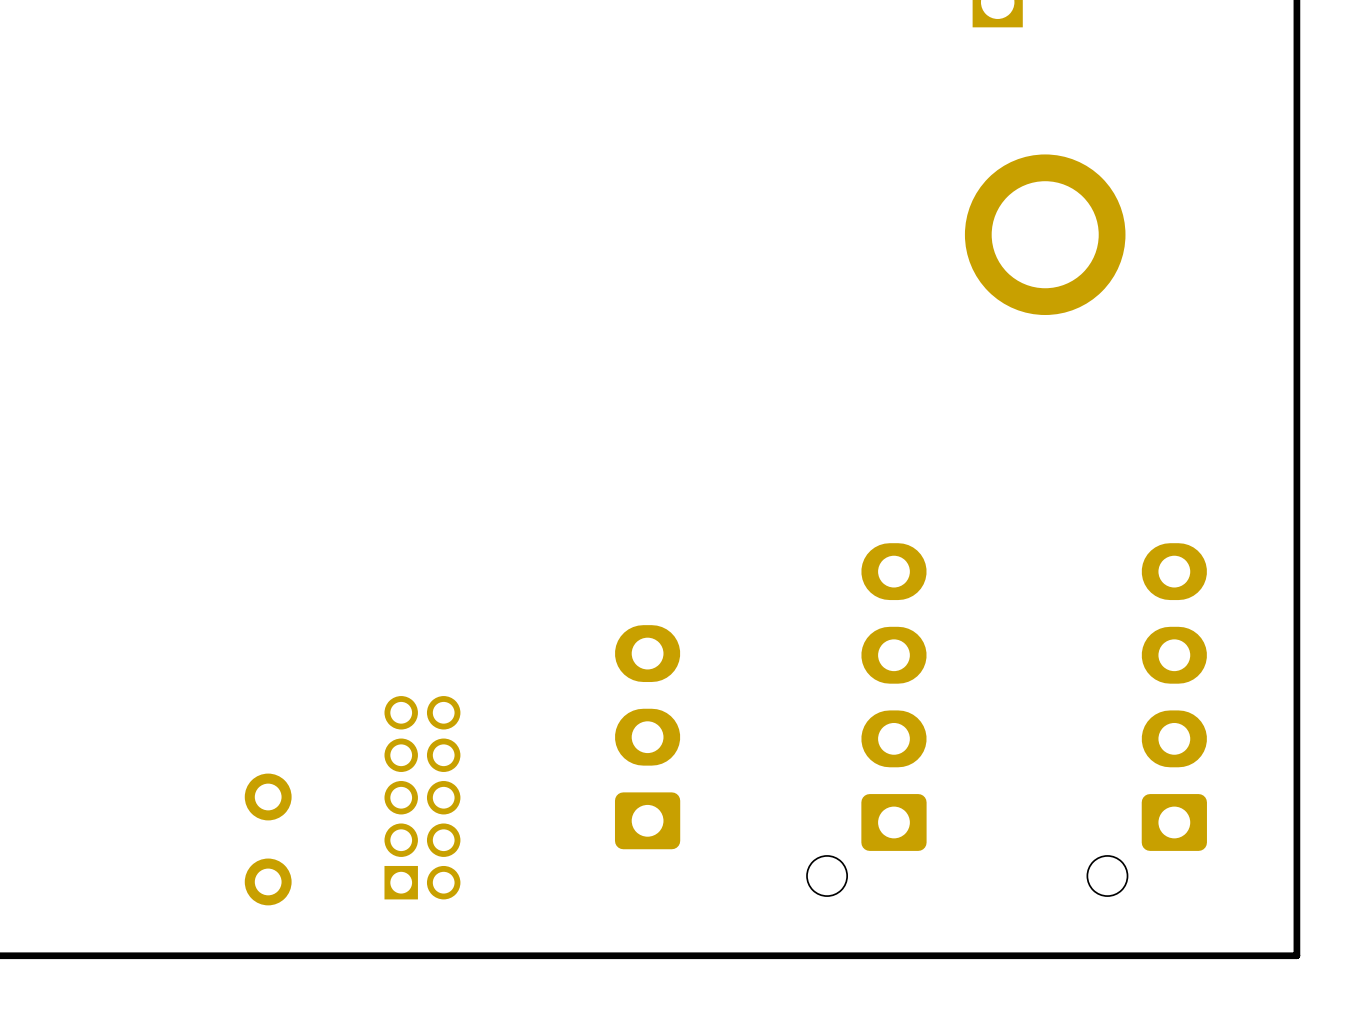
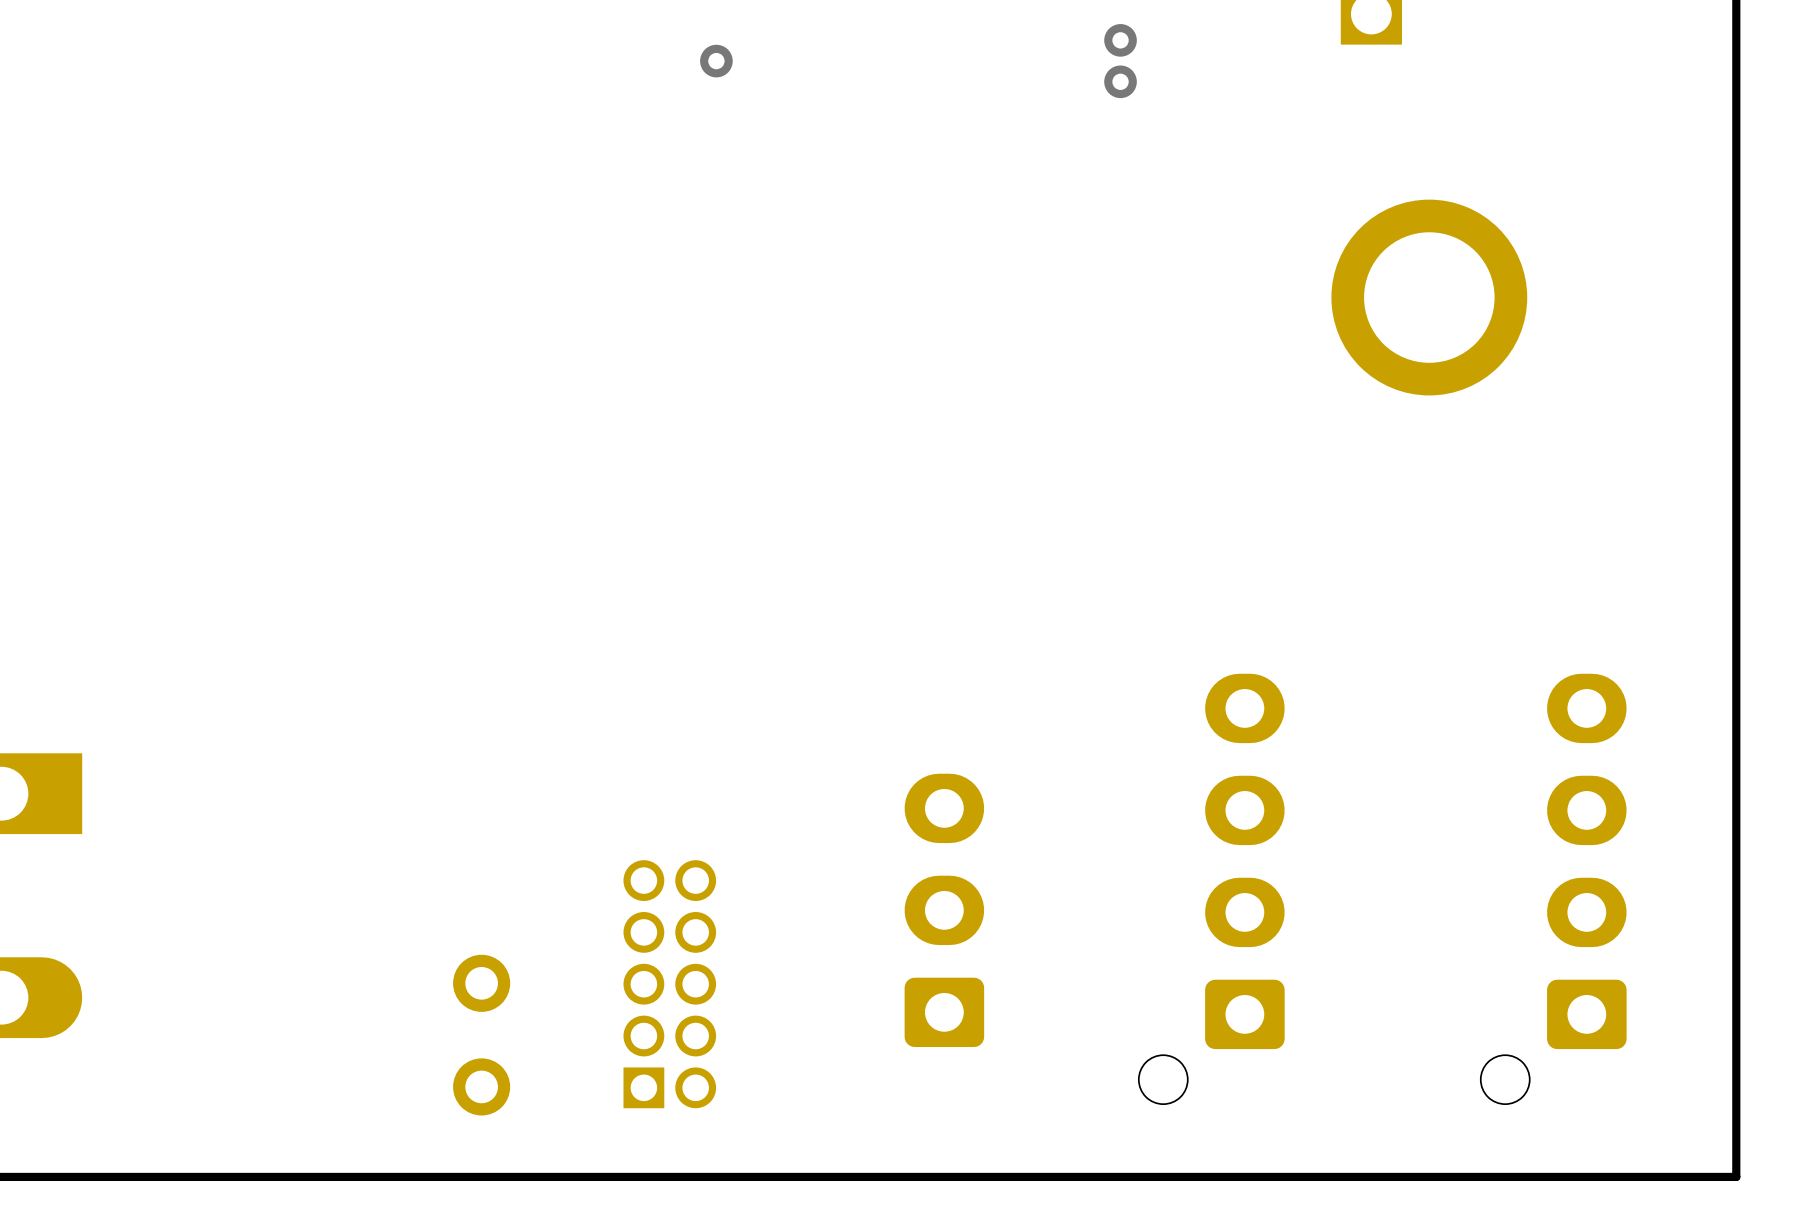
via: none -> (1120, 40)
via: none -> (716, 61)
via: none -> (1120, 81)

